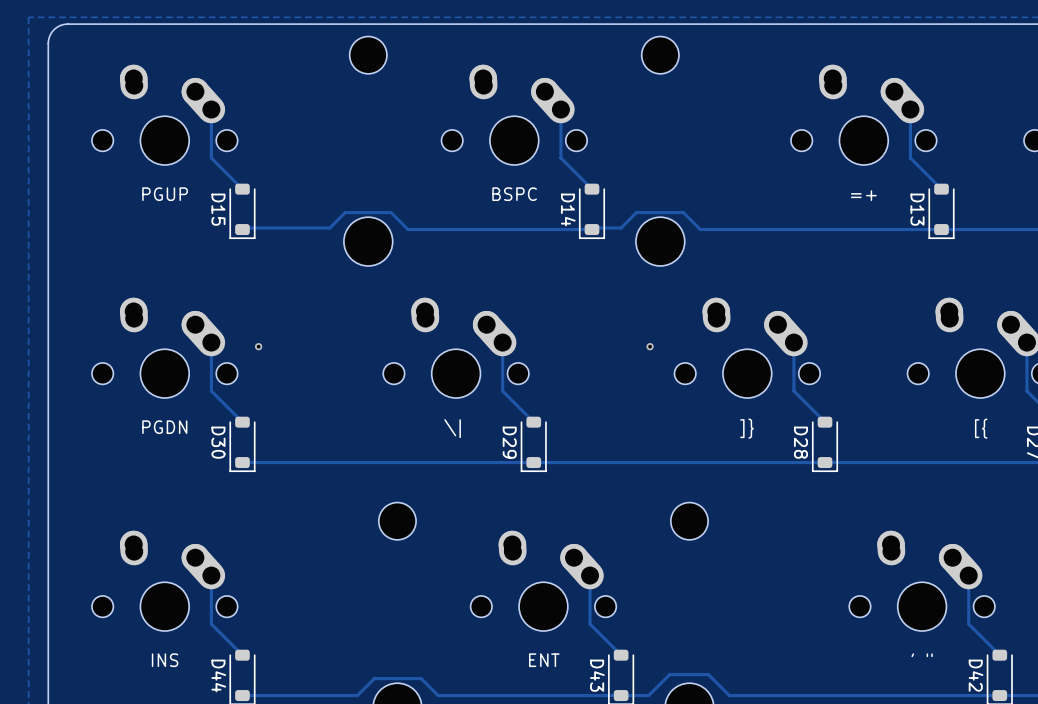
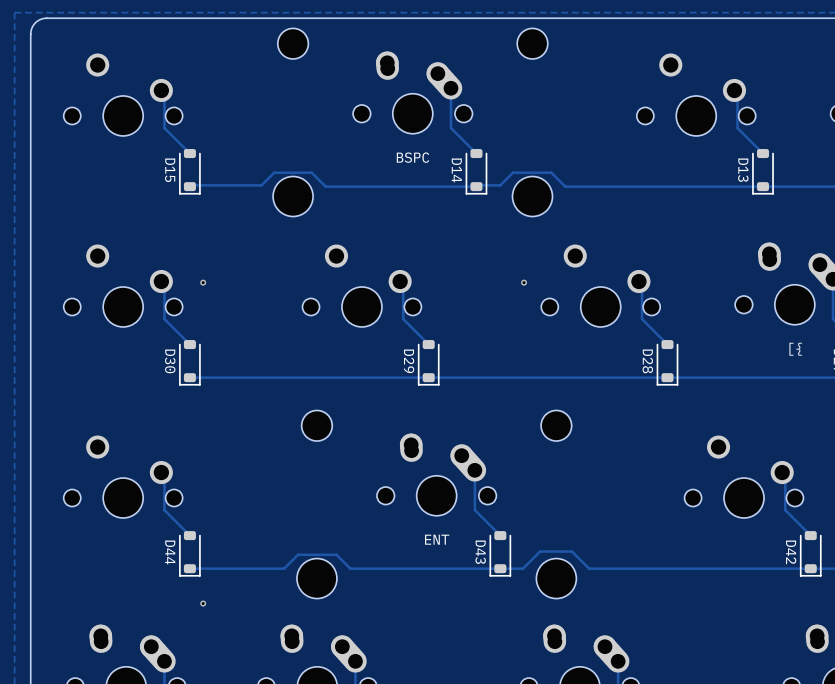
part footprint: [91, 64, 238, 166] -> [63, 53, 183, 136]
part footprint: [791, 64, 937, 166] -> [636, 53, 756, 136]
part value: PGUP (165, 194) -> none
part value: =+ (863, 195) -> none
part footprint: [91, 297, 238, 399] -> [63, 244, 183, 327]
part footprint: [383, 297, 529, 399] -> [302, 244, 422, 327]
part footprint: [674, 297, 821, 399] -> [541, 244, 661, 327]
part value: PGDN (164, 427) -> none
part value: \| (452, 428) -> none
part value: ]} (747, 428) -> none
part footprint: [91, 530, 238, 632] -> [63, 435, 183, 519]
part footprint: [849, 530, 995, 632] -> [684, 435, 804, 519]
part value: ' " (922, 655) -> none
part value: INS (165, 660) -> none

